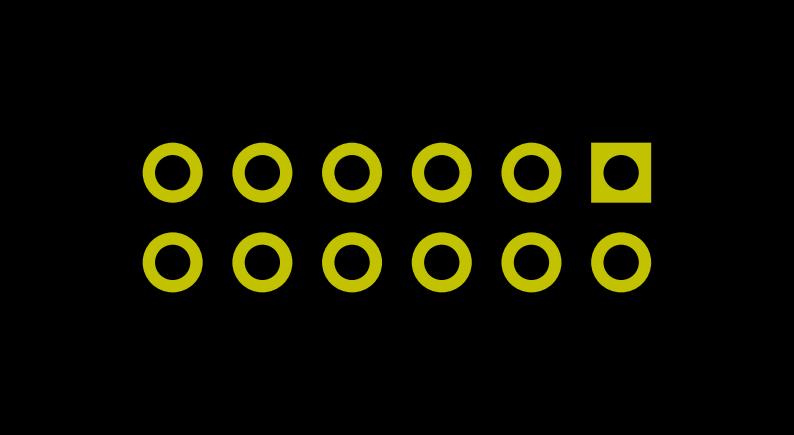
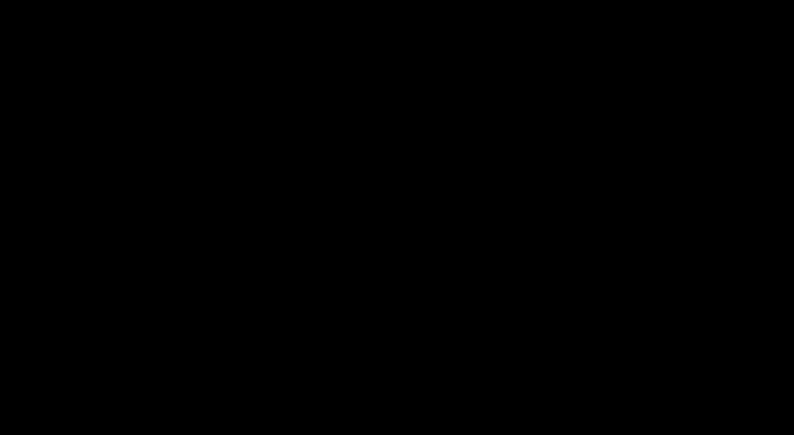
part: (396, 217) -> none

